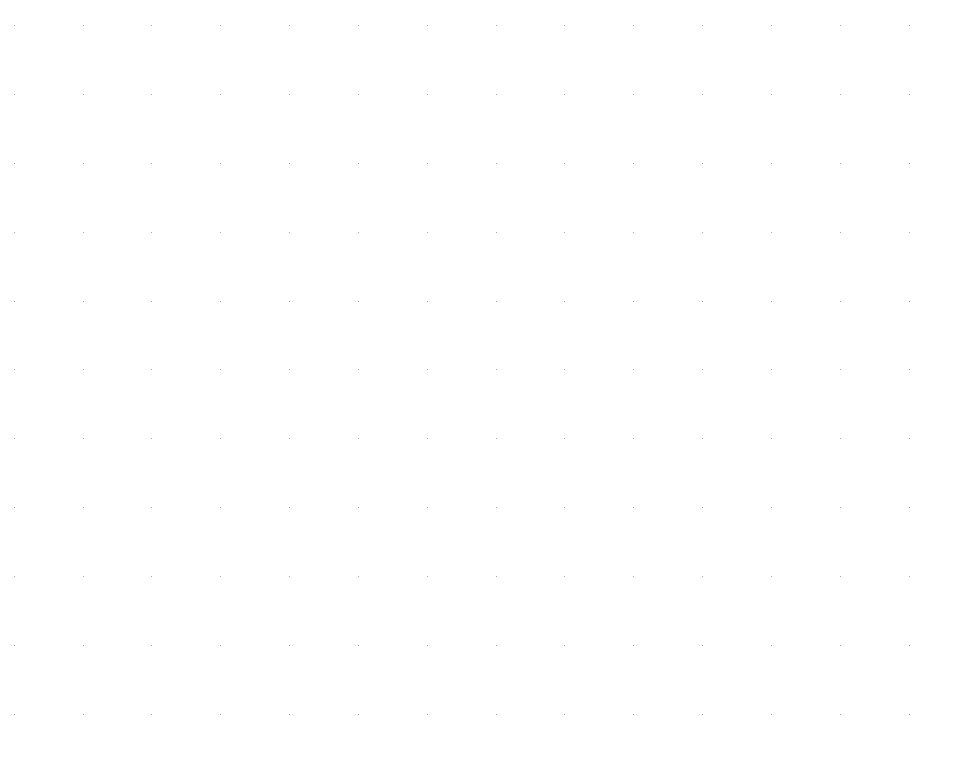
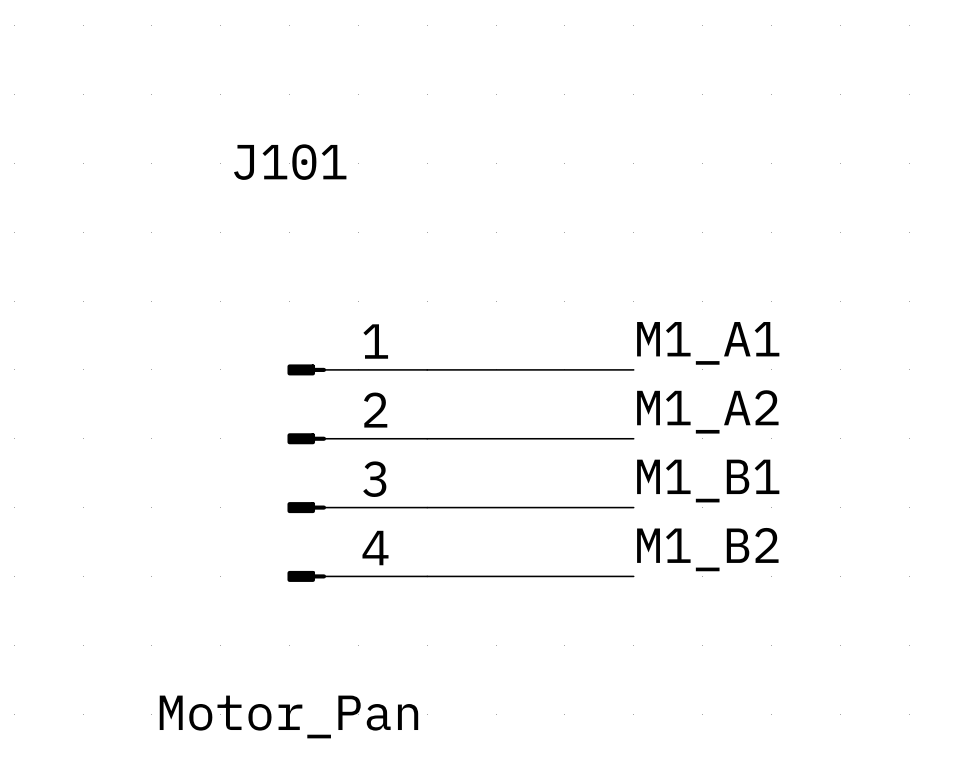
label: none -> M1_A1 (708, 343)
wire: none -> (427, 369) (633, 369)
label: none -> M1_A2 (707, 411)
wire: none -> (427, 438) (633, 438)
J101: none -> Motor_Pan (357, 473)
label: none -> M1_B1 (708, 481)
wire: none -> (427, 507) (633, 507)
label: none -> M1_B2 (707, 549)
wire: none -> (427, 576) (633, 576)

